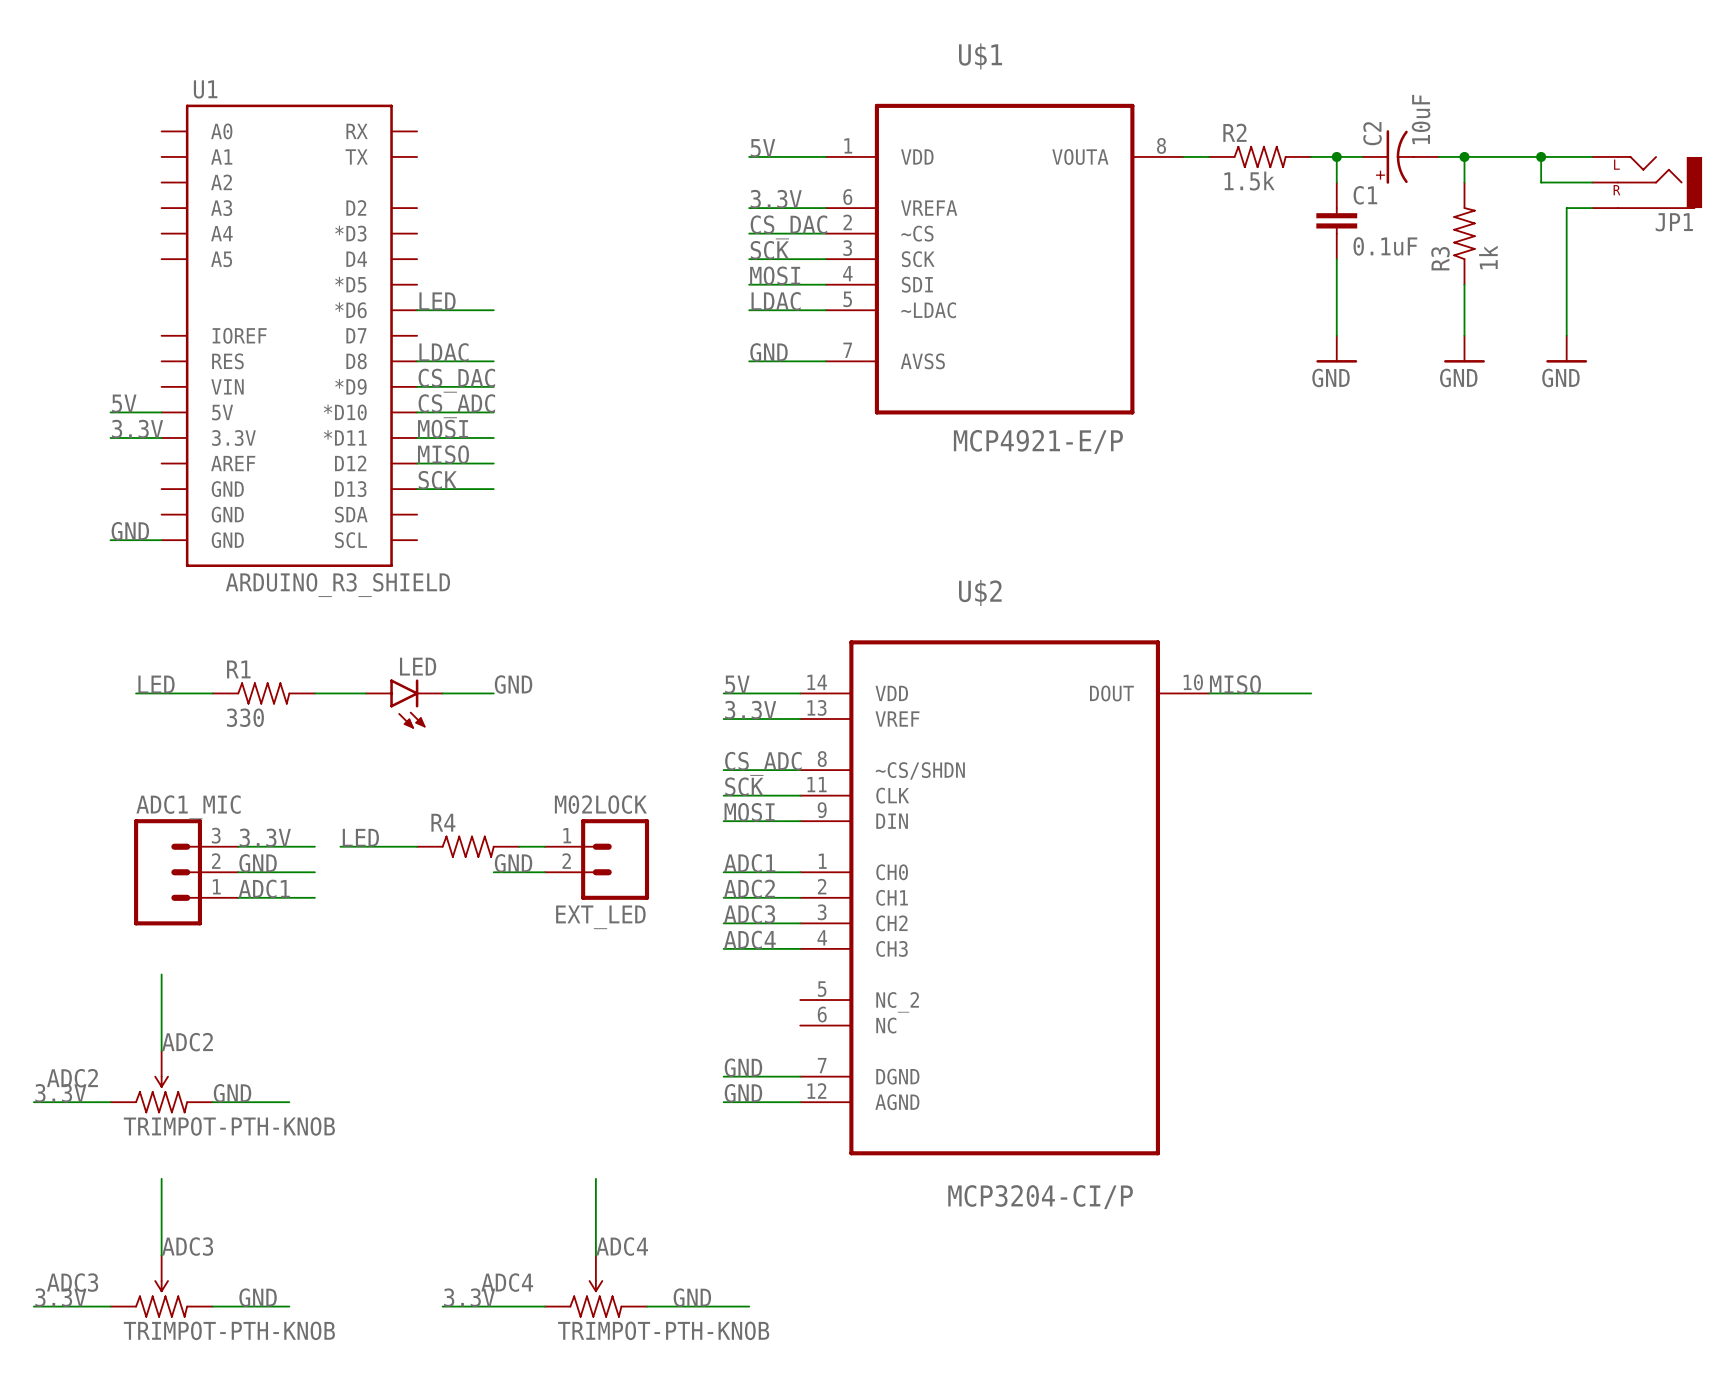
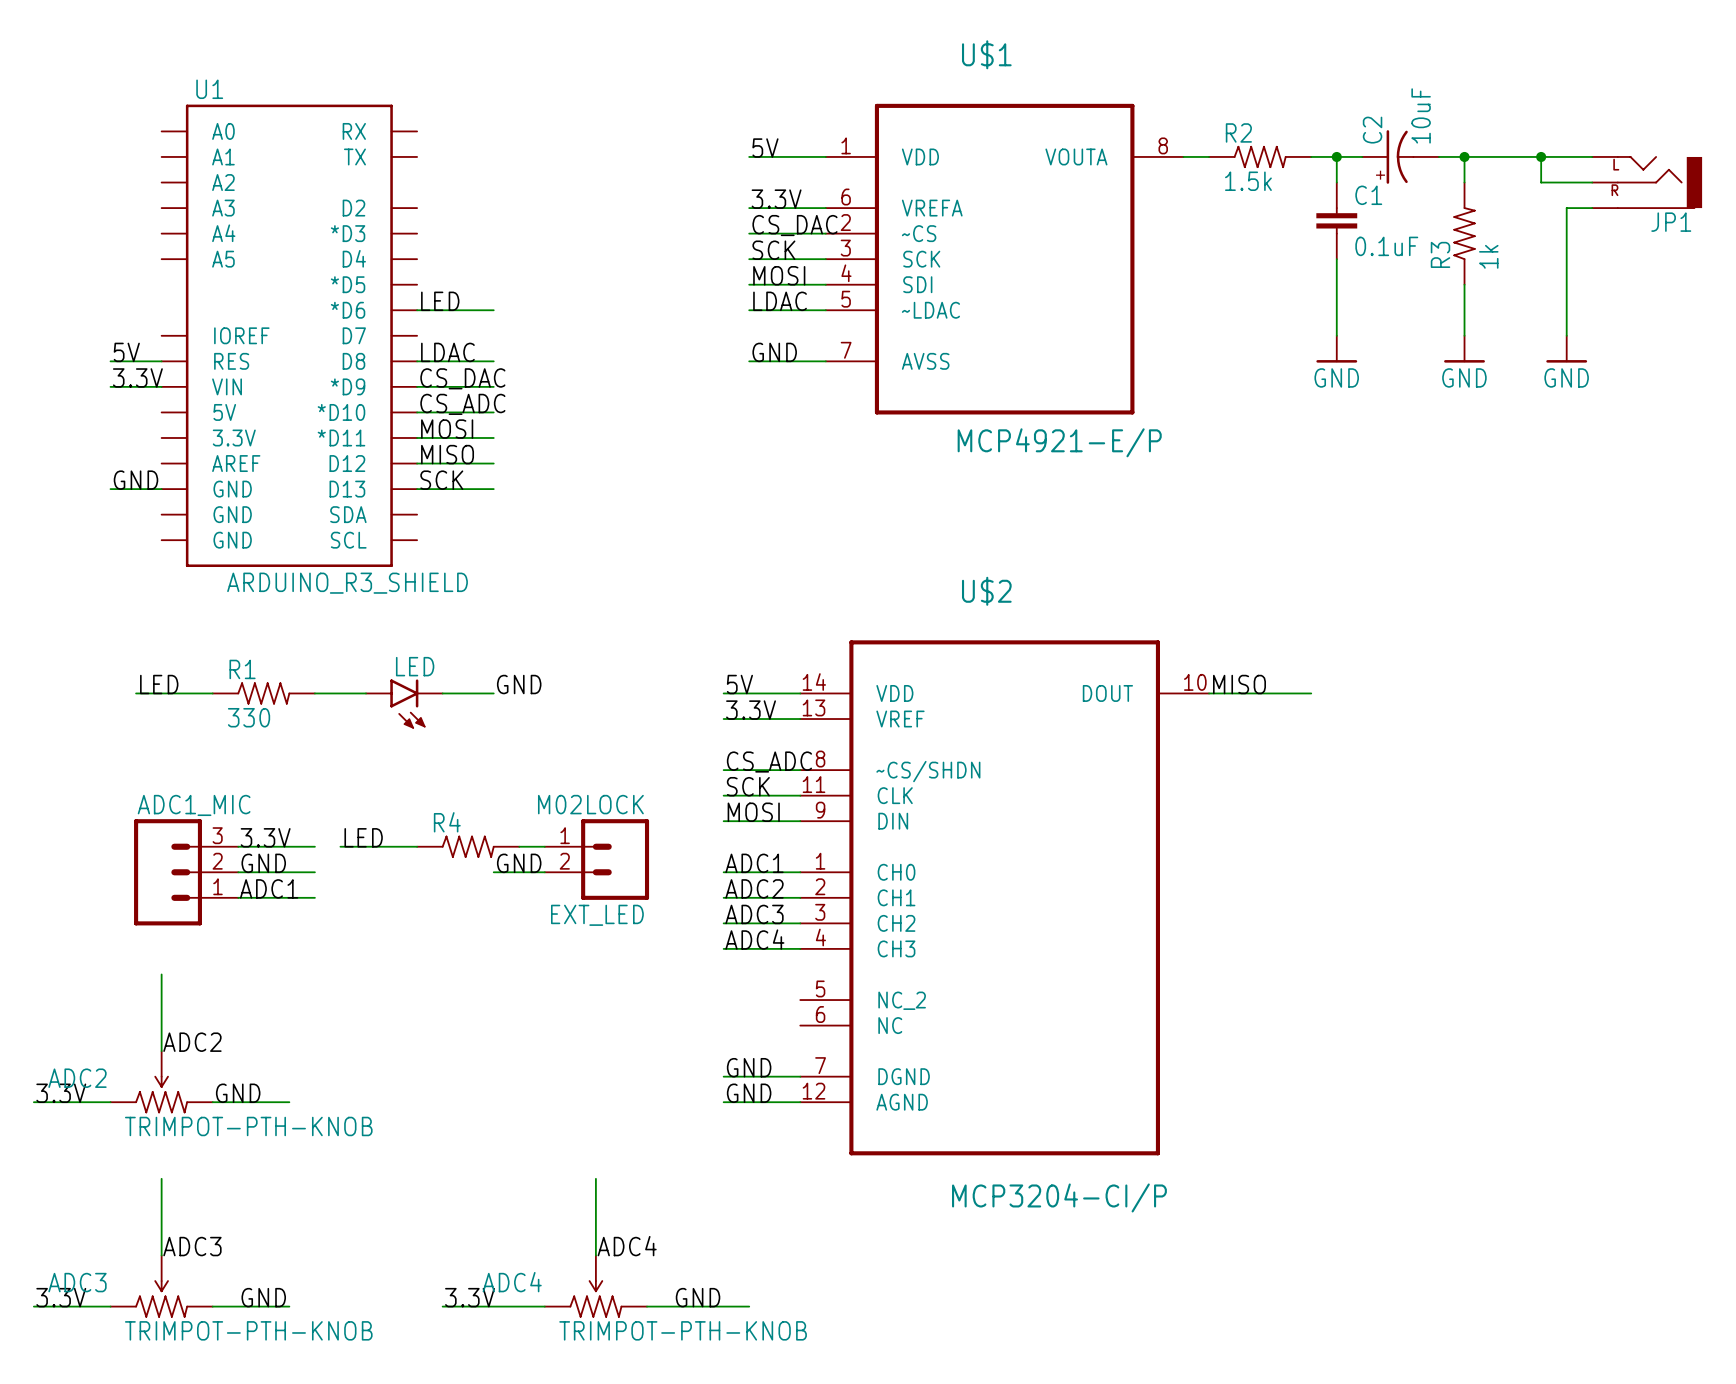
label position: 5V (124, 403) -> 5V (126, 352)
wire: (110, 412) (161, 412) -> (110, 361) (161, 361)
label position: 3.3V (137, 429) -> 3.3V (137, 377)
wire: (110, 437) (161, 437) -> (110, 386) (161, 386)
label position: GND (130, 531) -> GND (136, 480)
wire: (110, 540) (161, 540) -> (110, 489) (161, 489)

